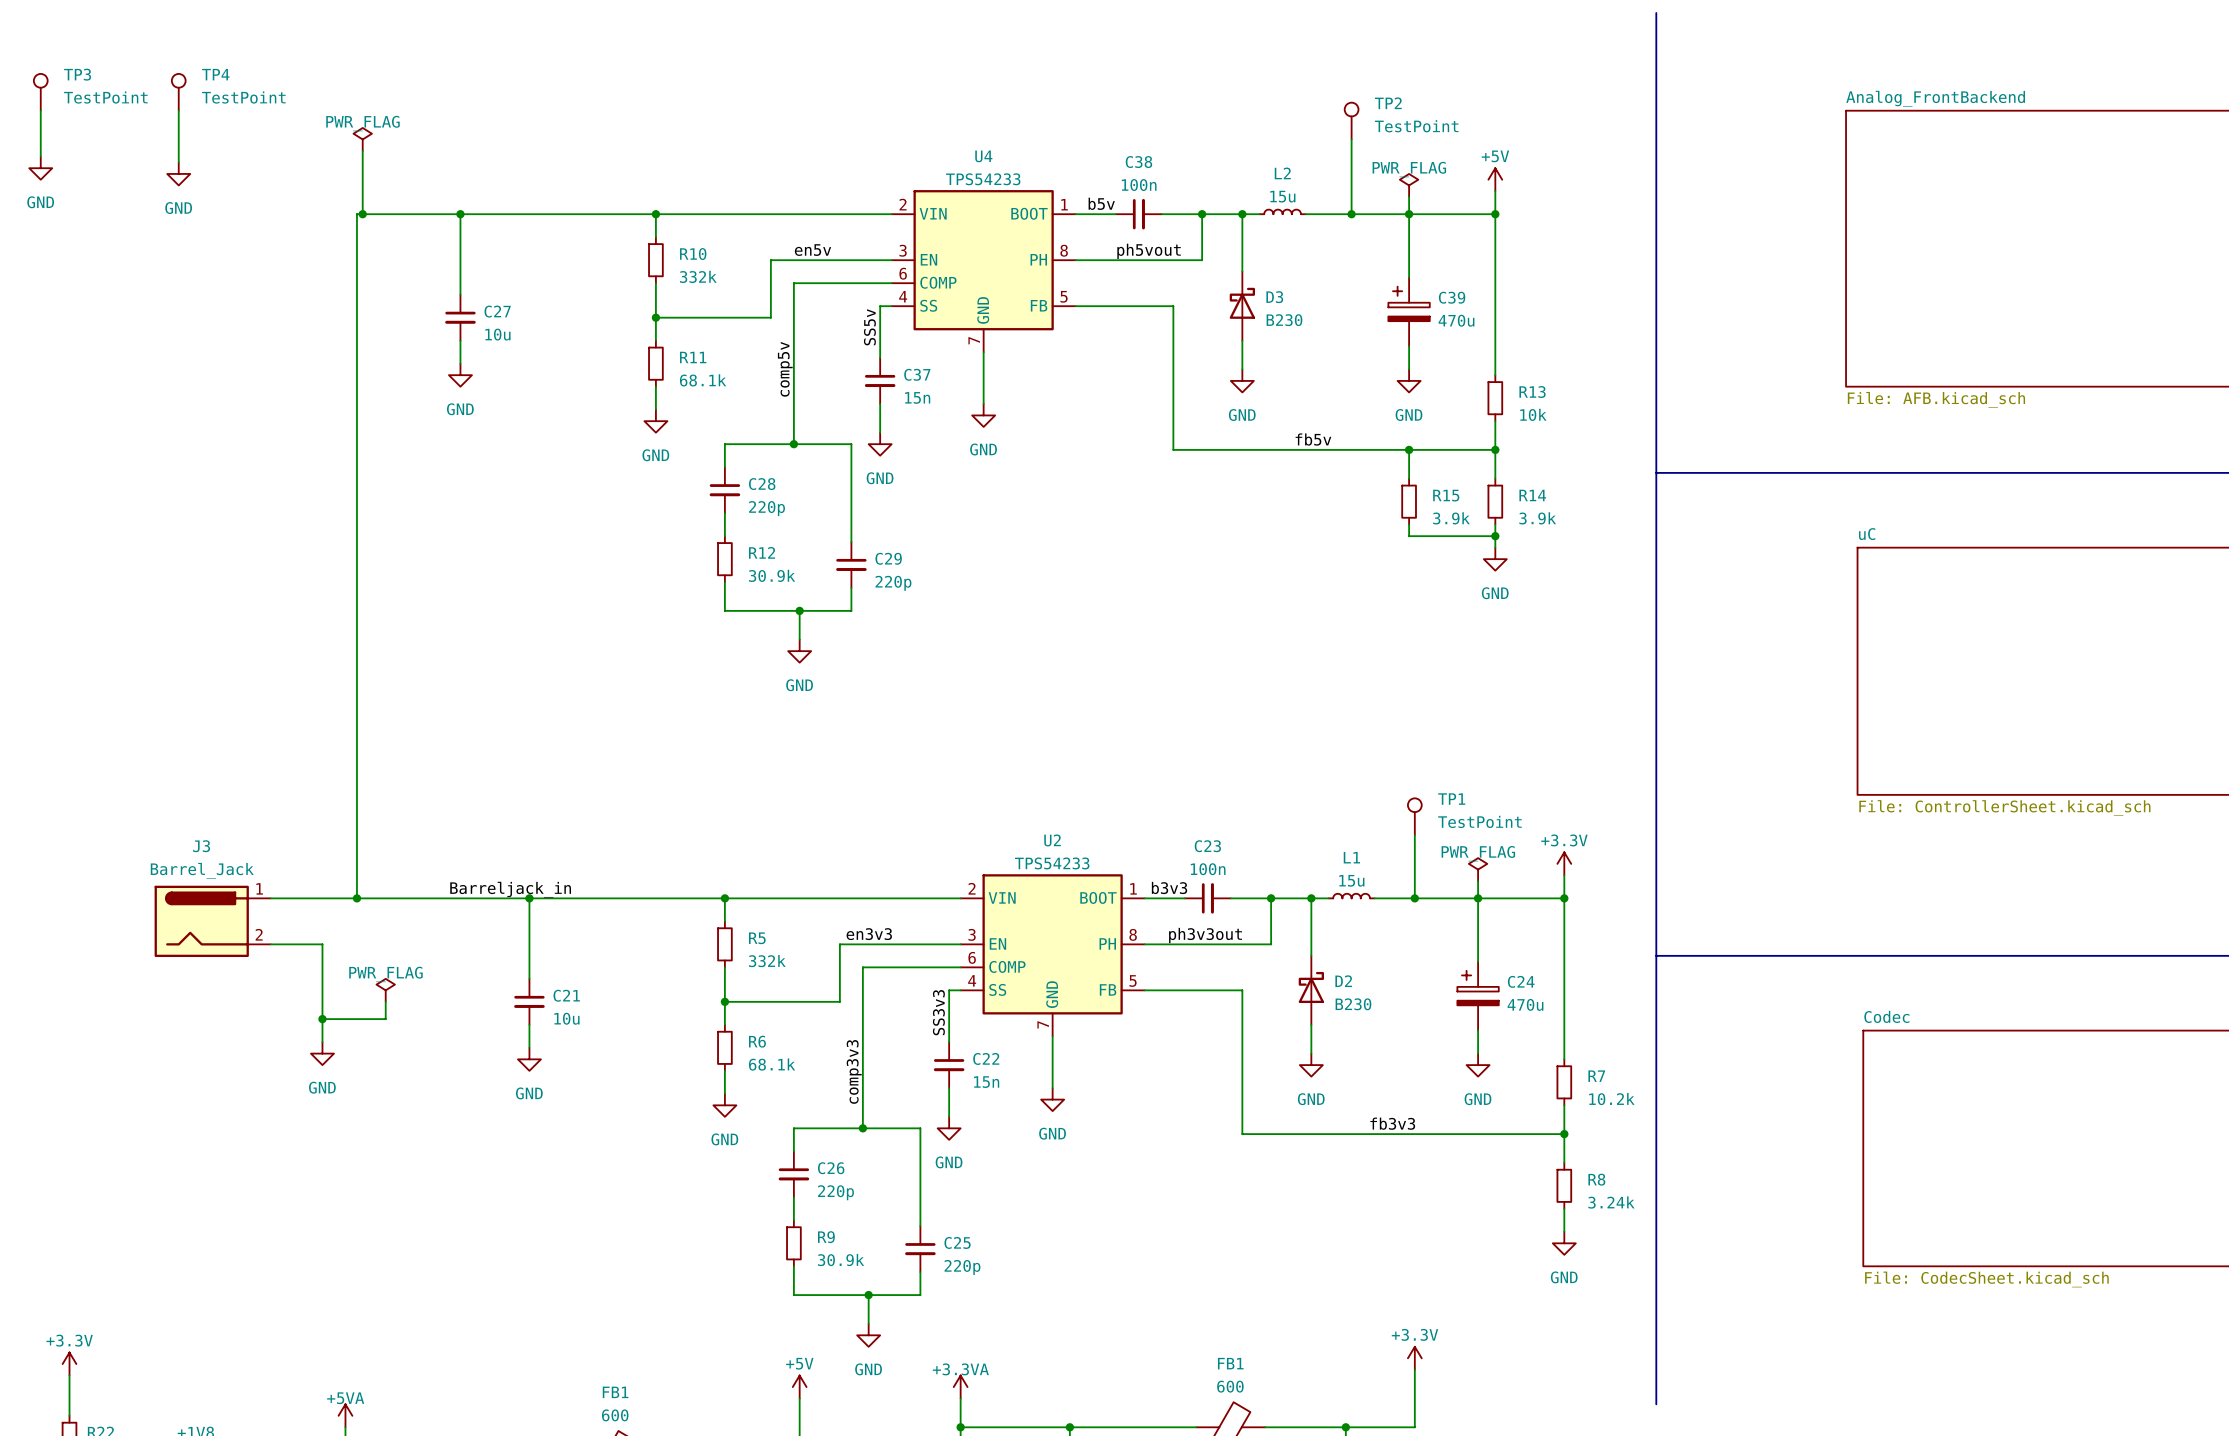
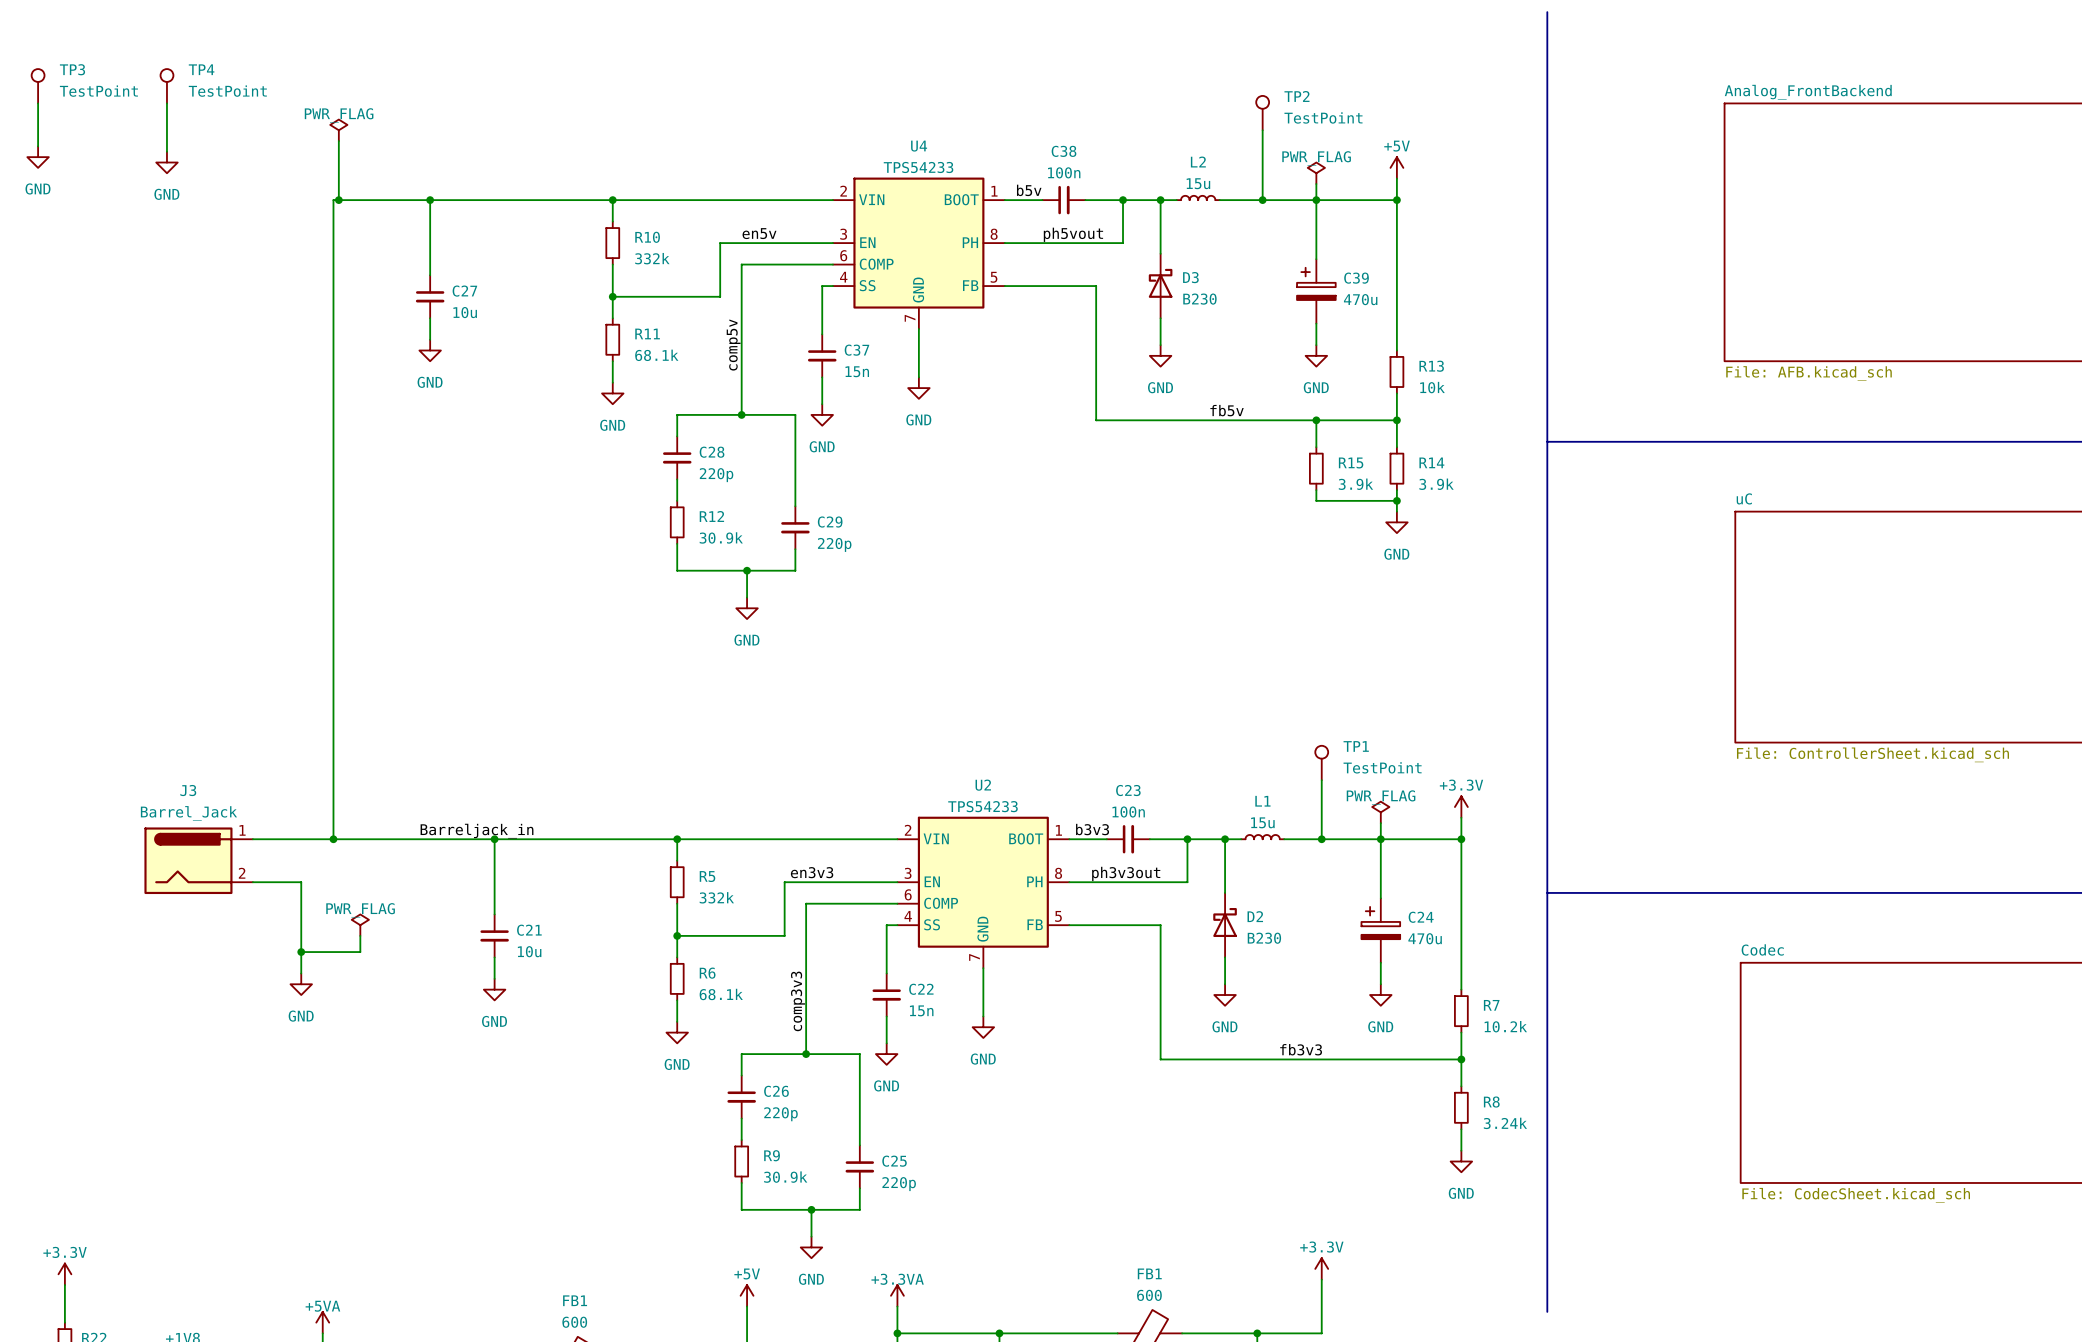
label: SS5v (869, 327) -> none
label: SS3v3 (938, 1012) -> none

